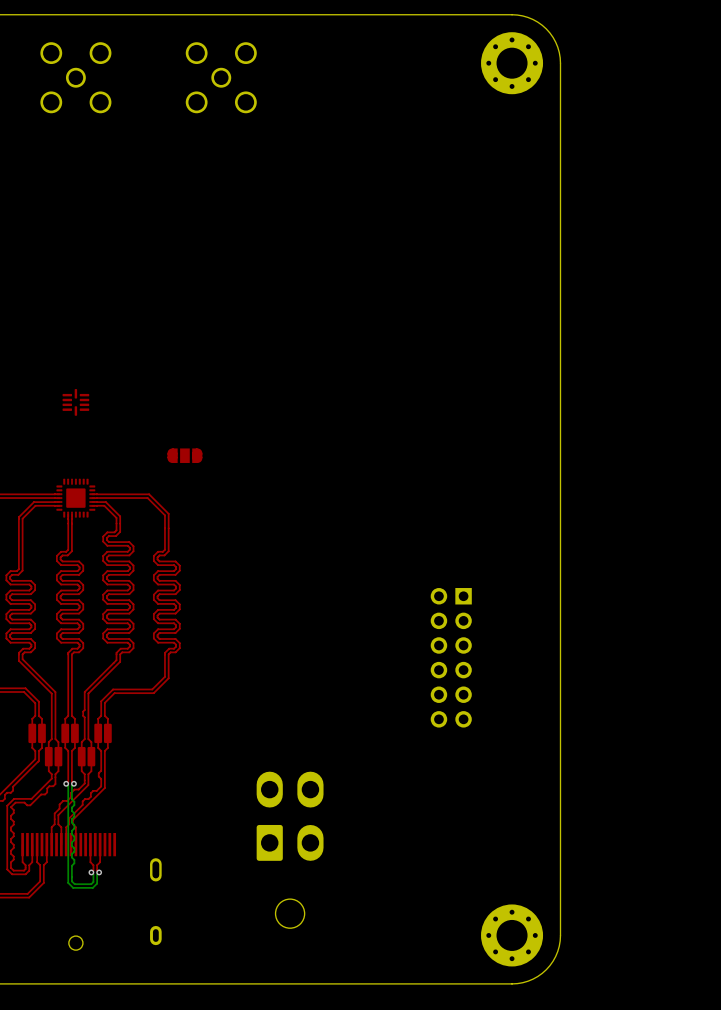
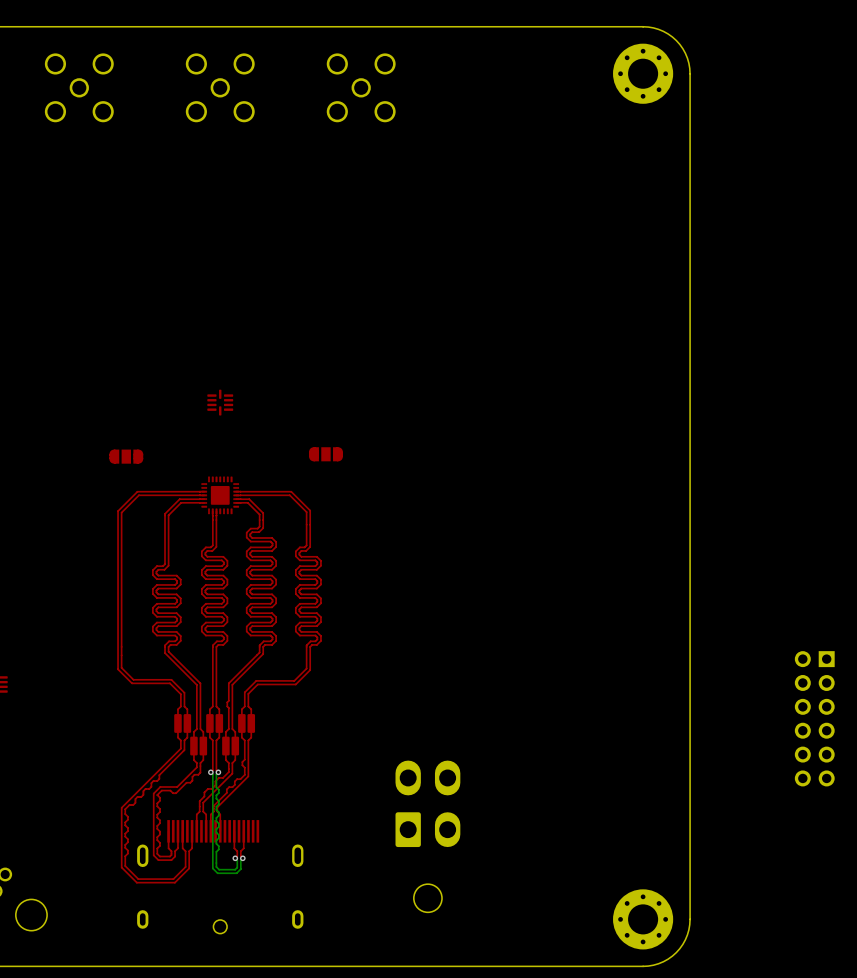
part: (451, 657) -> none
part: none -> (814, 718)

